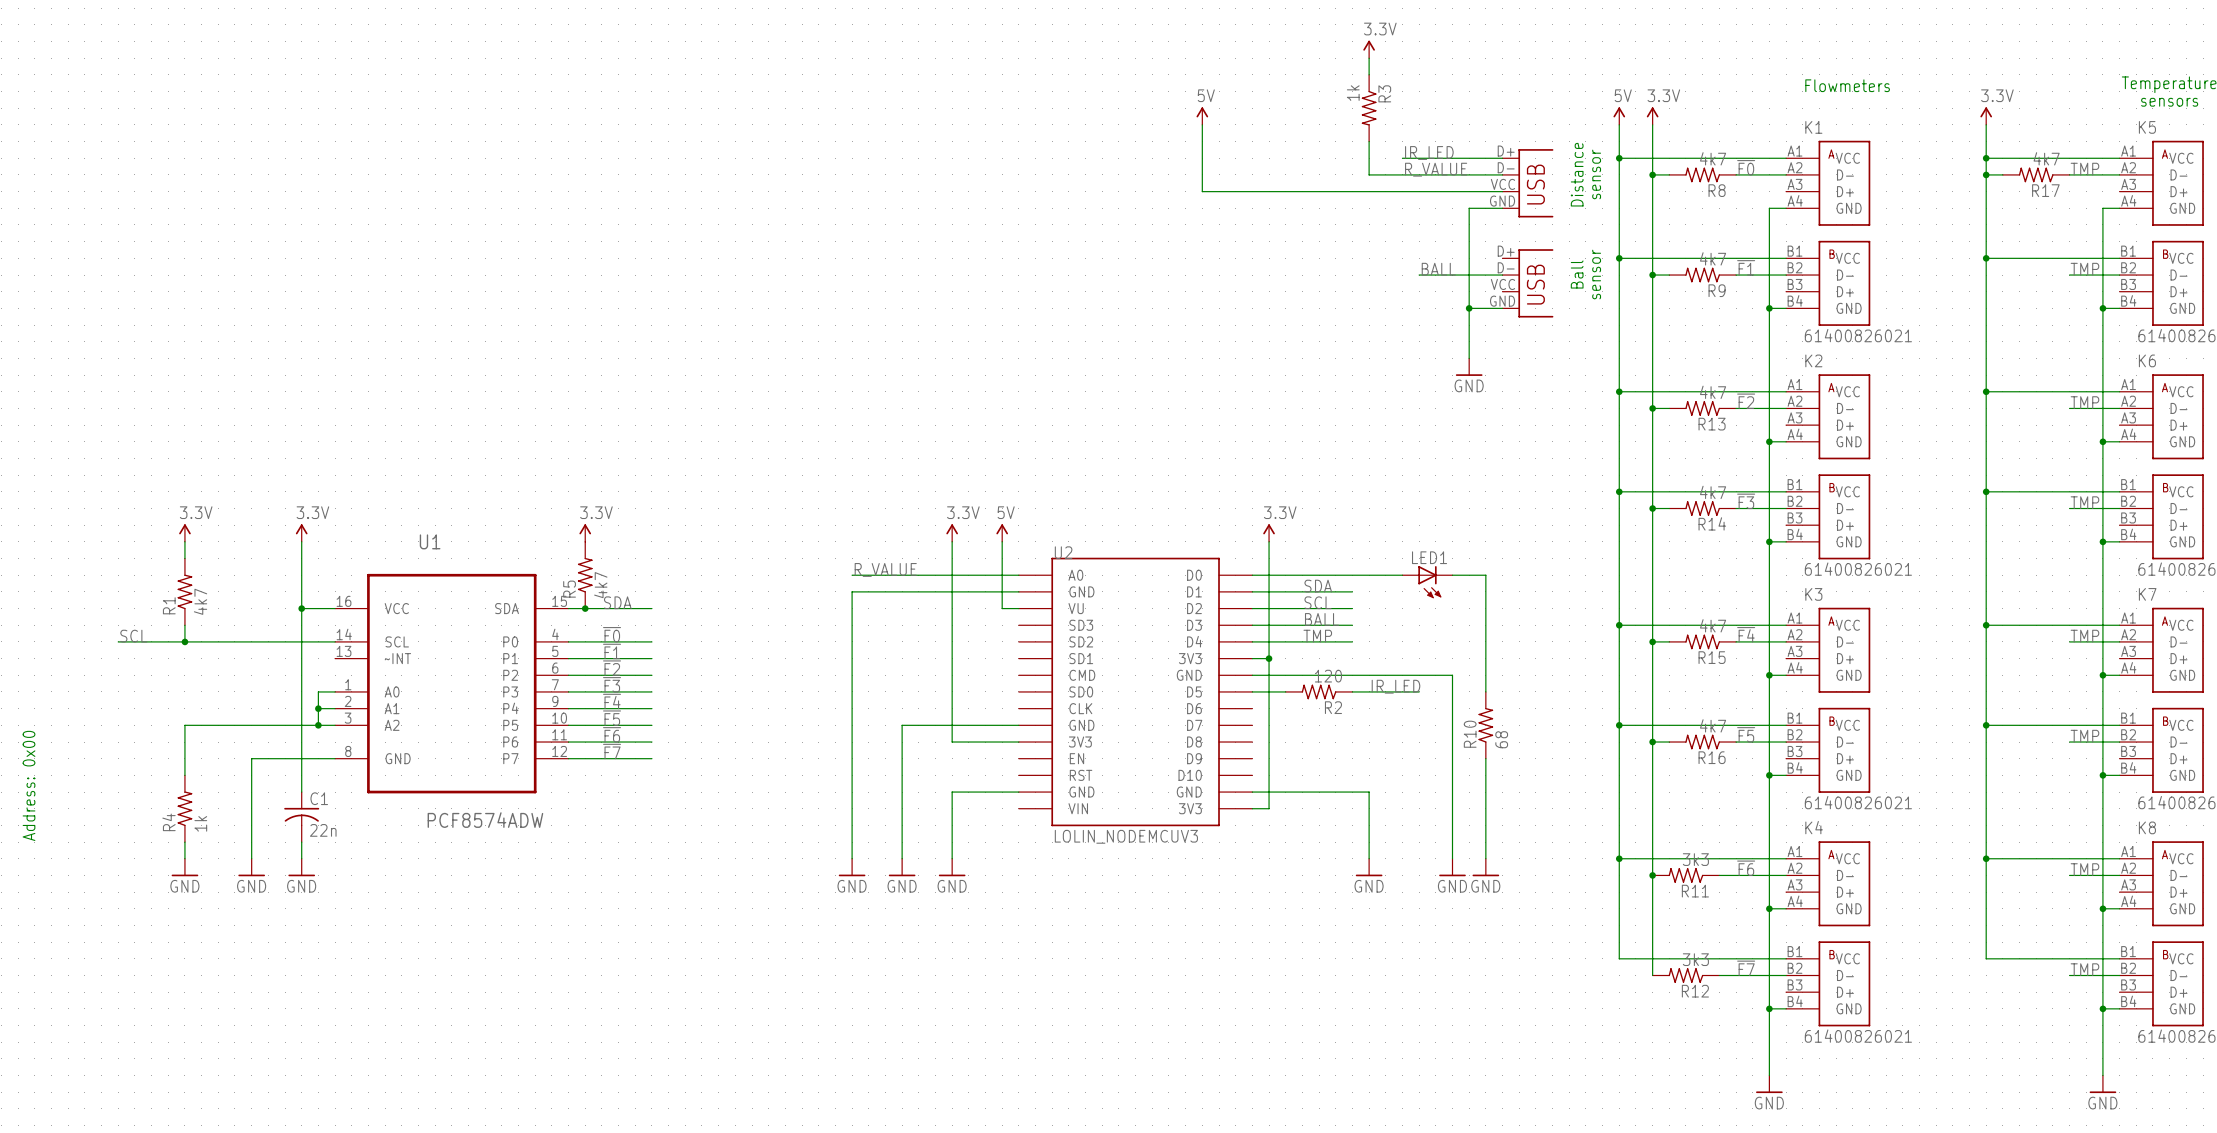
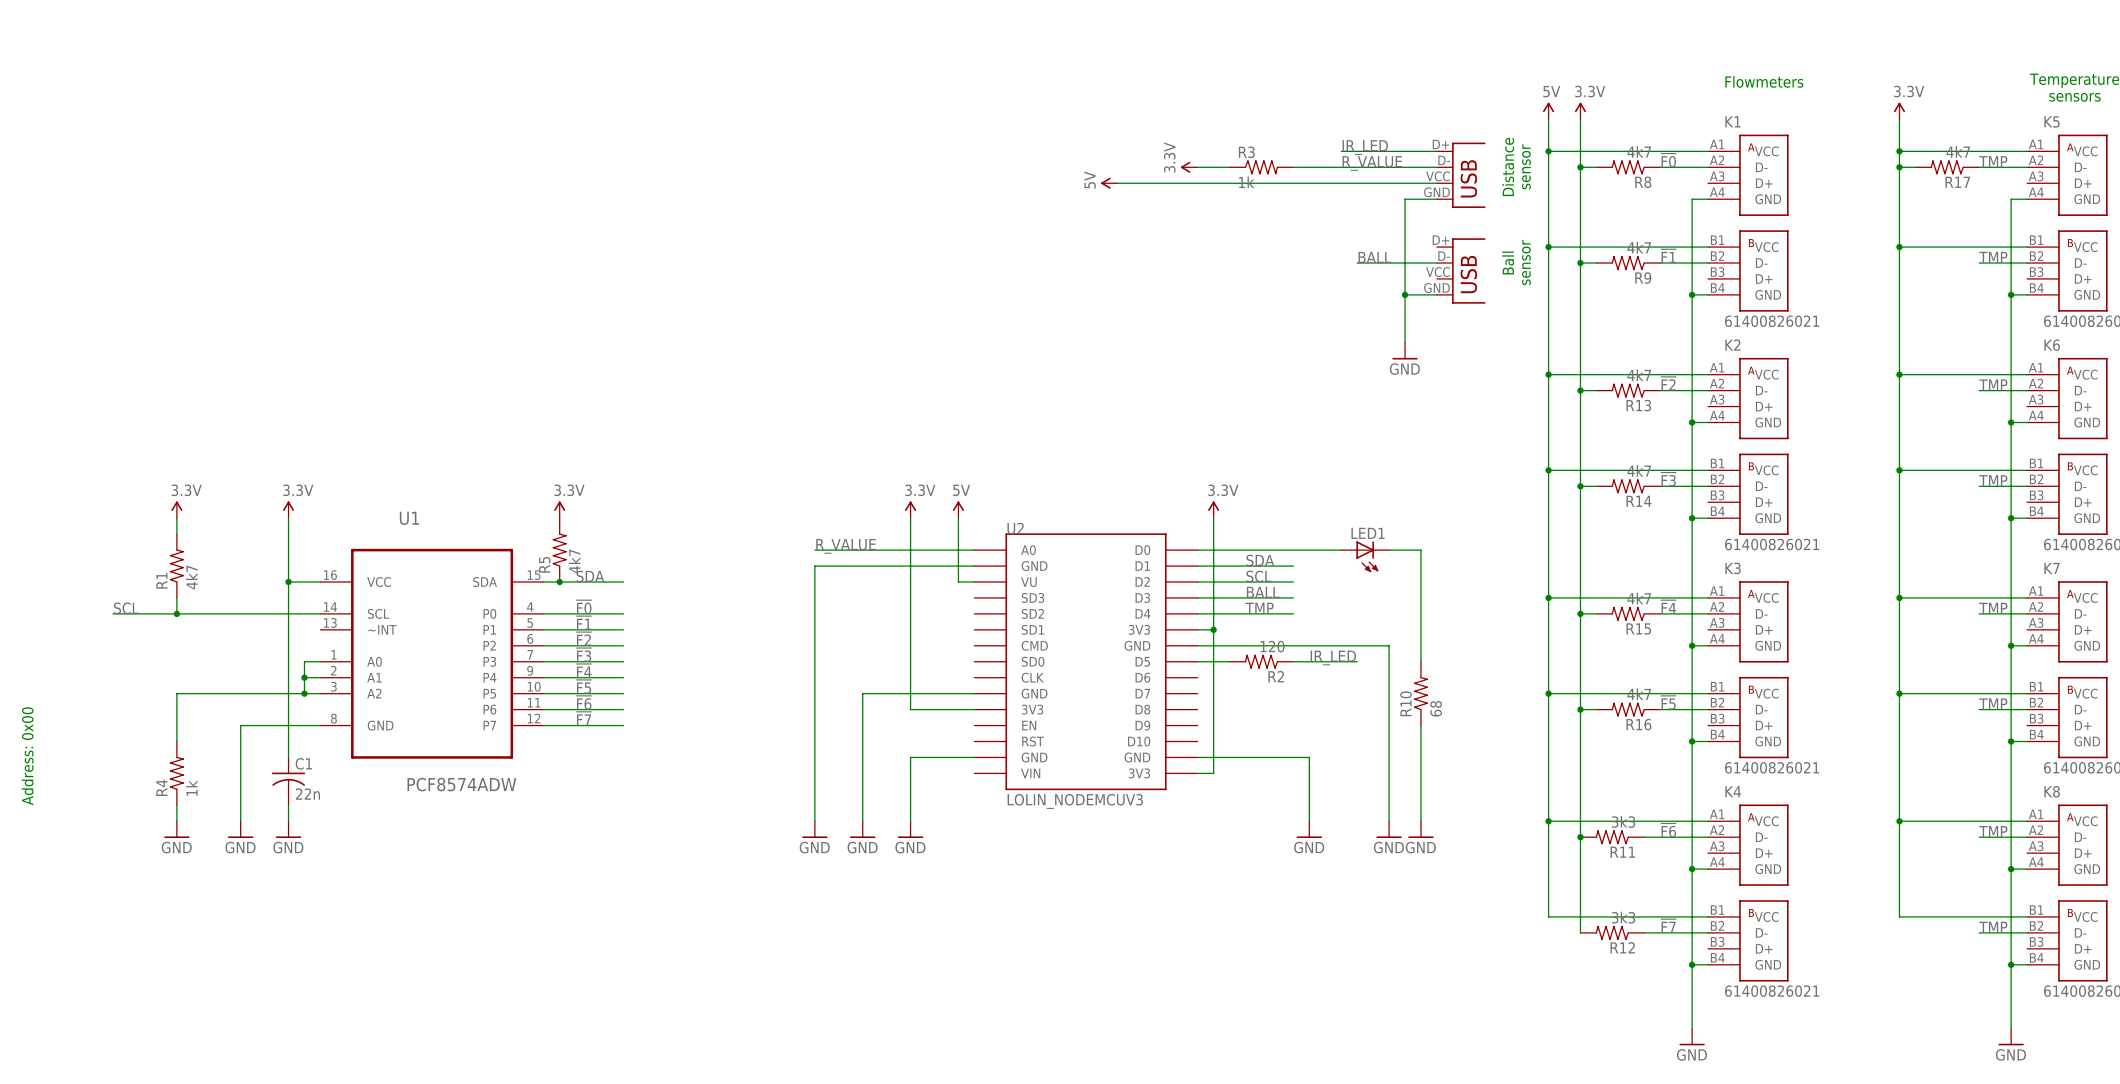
power symbol: 3.3V (1369, 49) -> none
wire: (1369, 58) (1369, 74) -> none
R3 rotation: 0° (1369, 108) -> 90° counterclockwise (1261, 167)
R3 position: (1369, 108) -> (1261, 167)
power symbol rotation: 0° (1202, 112) -> 90° counterclockwise (1105, 183)
power symbol position: 5V (1202, 116) -> 5V (1109, 183)
wire: (1202, 124) (1202, 191) -> (1117, 183) (1149, 183)
wire: (1369, 141) (1369, 174) -> (1293, 167) (1309, 167)
power symbol: none -> 3.3V (1189, 167)
wire: none -> (1197, 167) (1229, 167)

